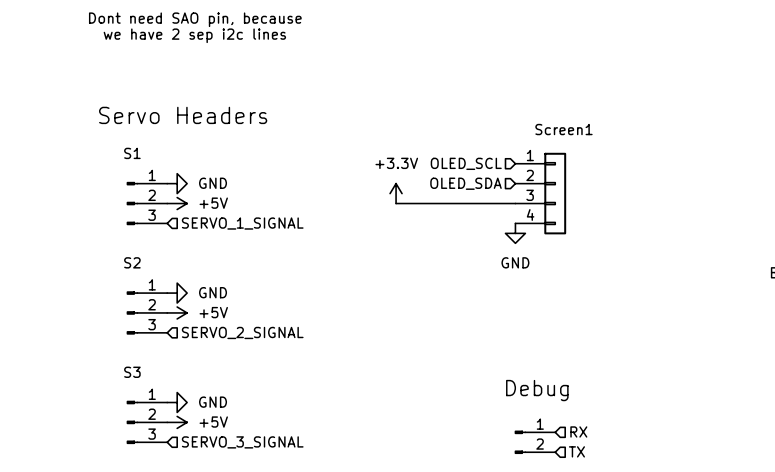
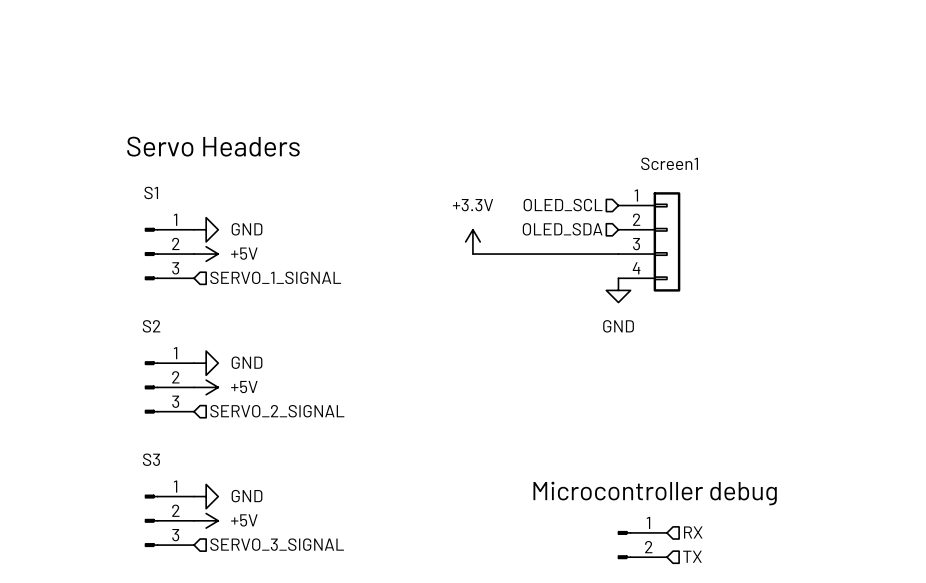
text: Dont need SAO pin, because (195, 19) -> none
text: we have 2 sep i2c lines (194, 35) -> none
text: Debug (537, 390) -> none
text: none -> Microcontroller debug (655, 493)

